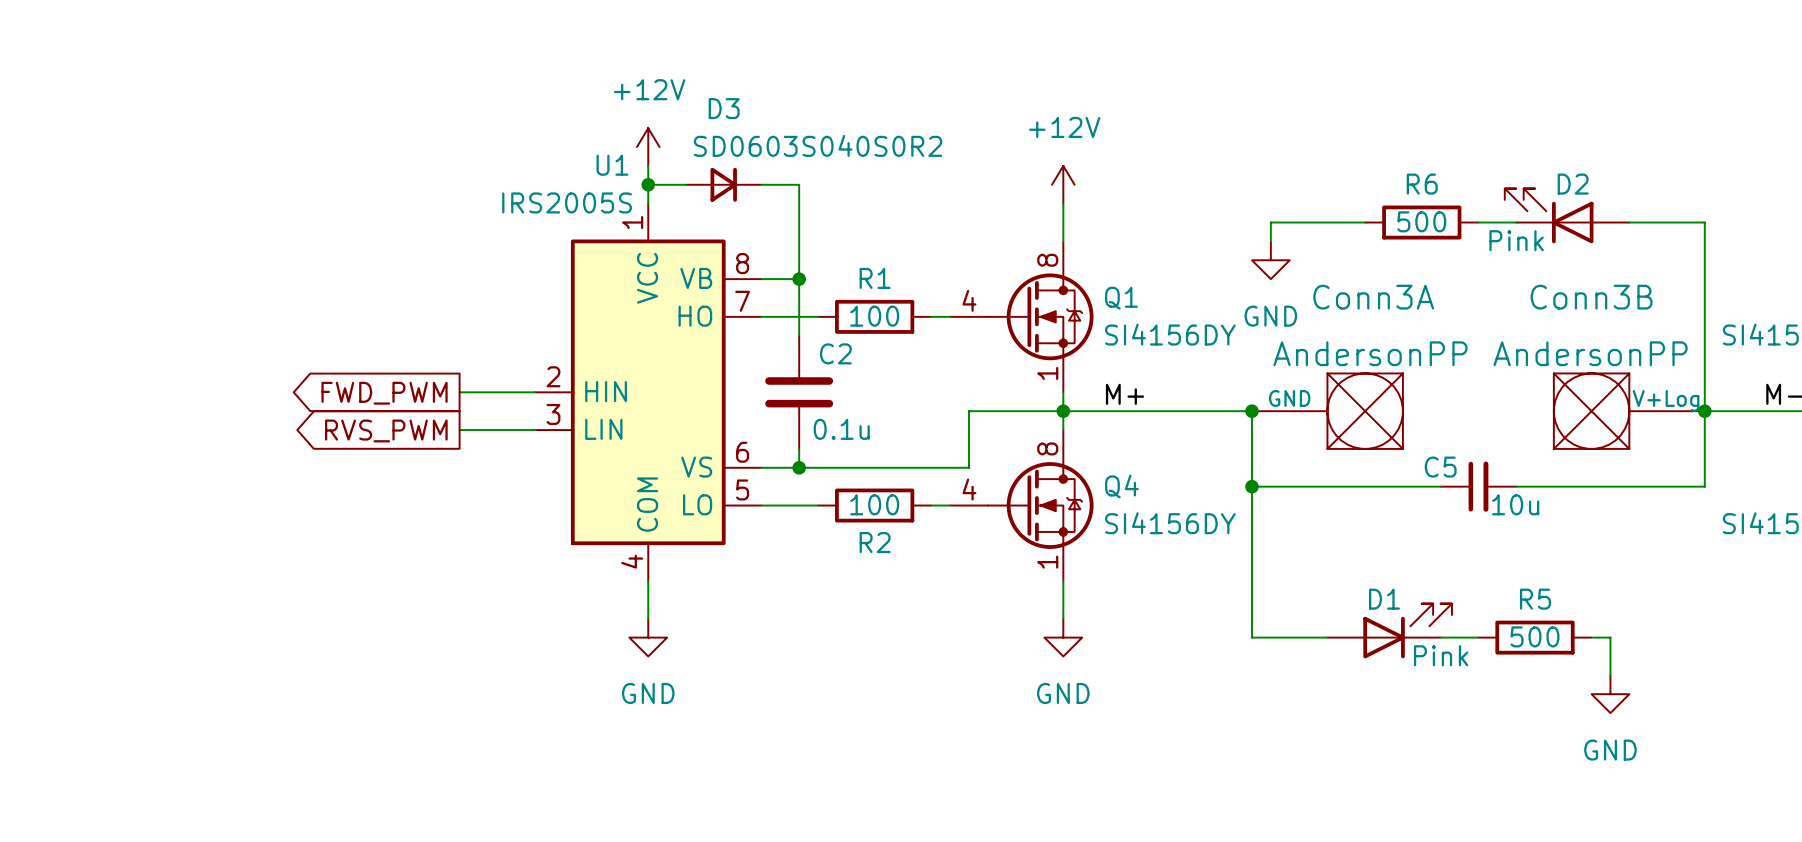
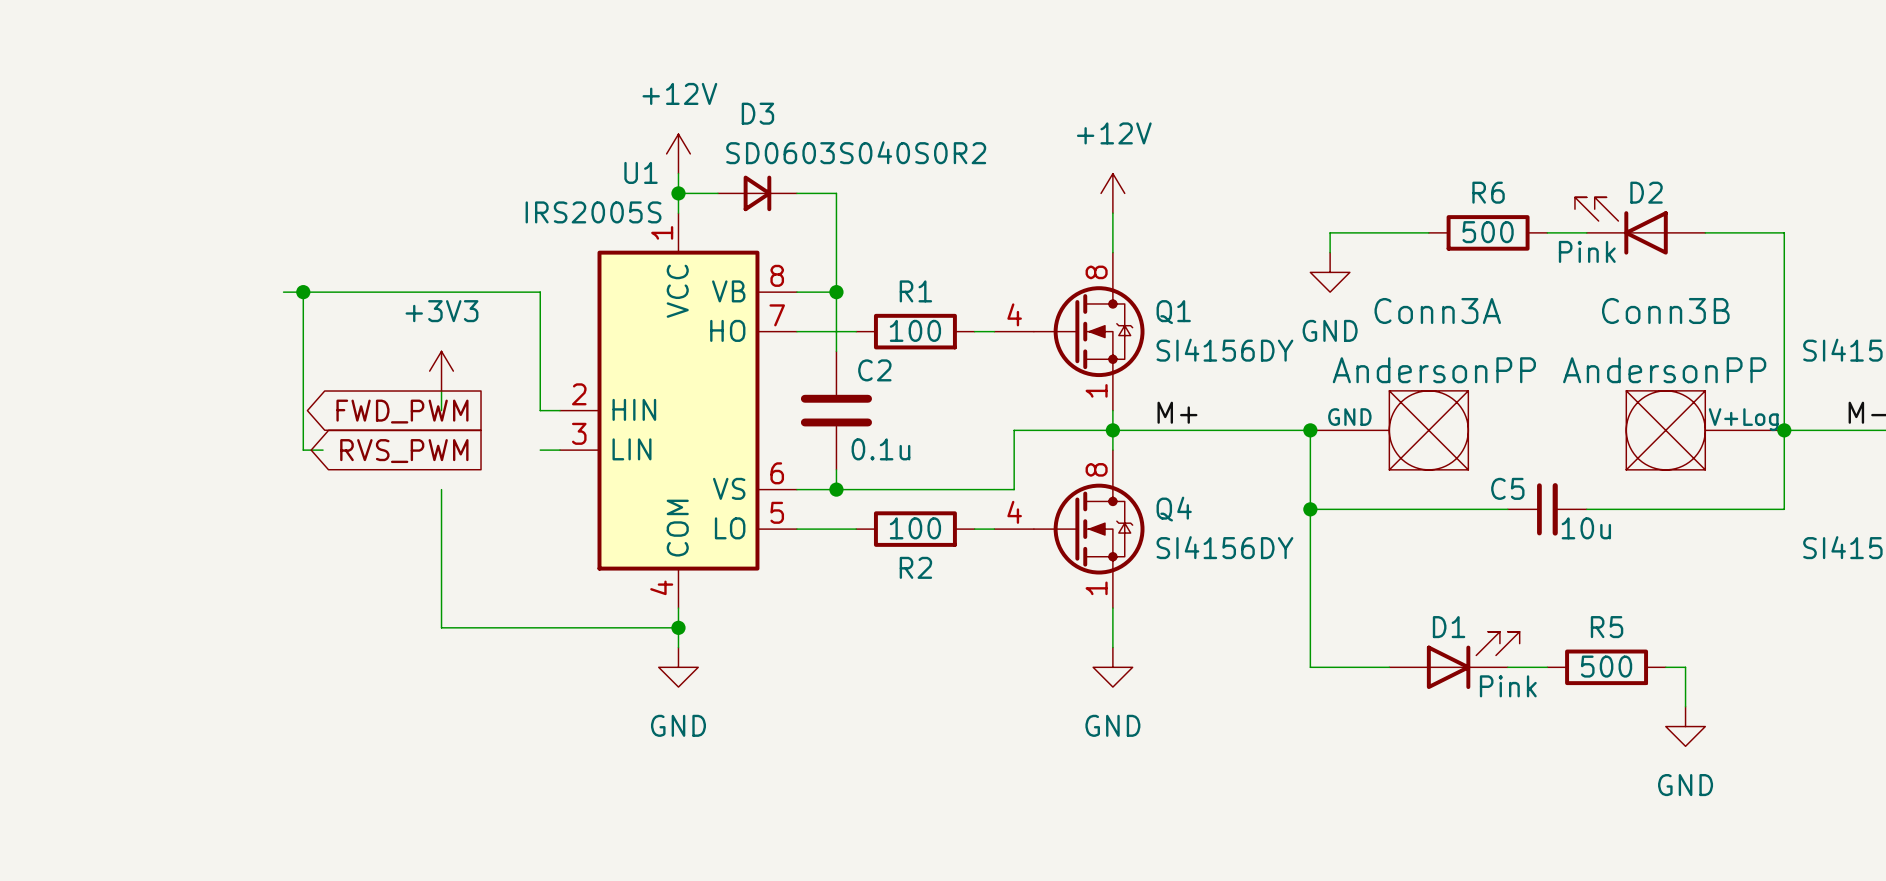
wire: none -> (303, 292) (303, 450) (323, 450)
junction: none -> (303, 292)
power symbol: none -> +3V3 (441, 371)
wire: none -> (441, 390) (441, 410)
wire: (459, 392) (516, 392) -> (283, 292) (540, 292) (540, 410)
wire: (459, 430) (516, 430) -> none
wire: none -> (441, 489) (441, 627) (678, 627)
junction: none -> (678, 627)

